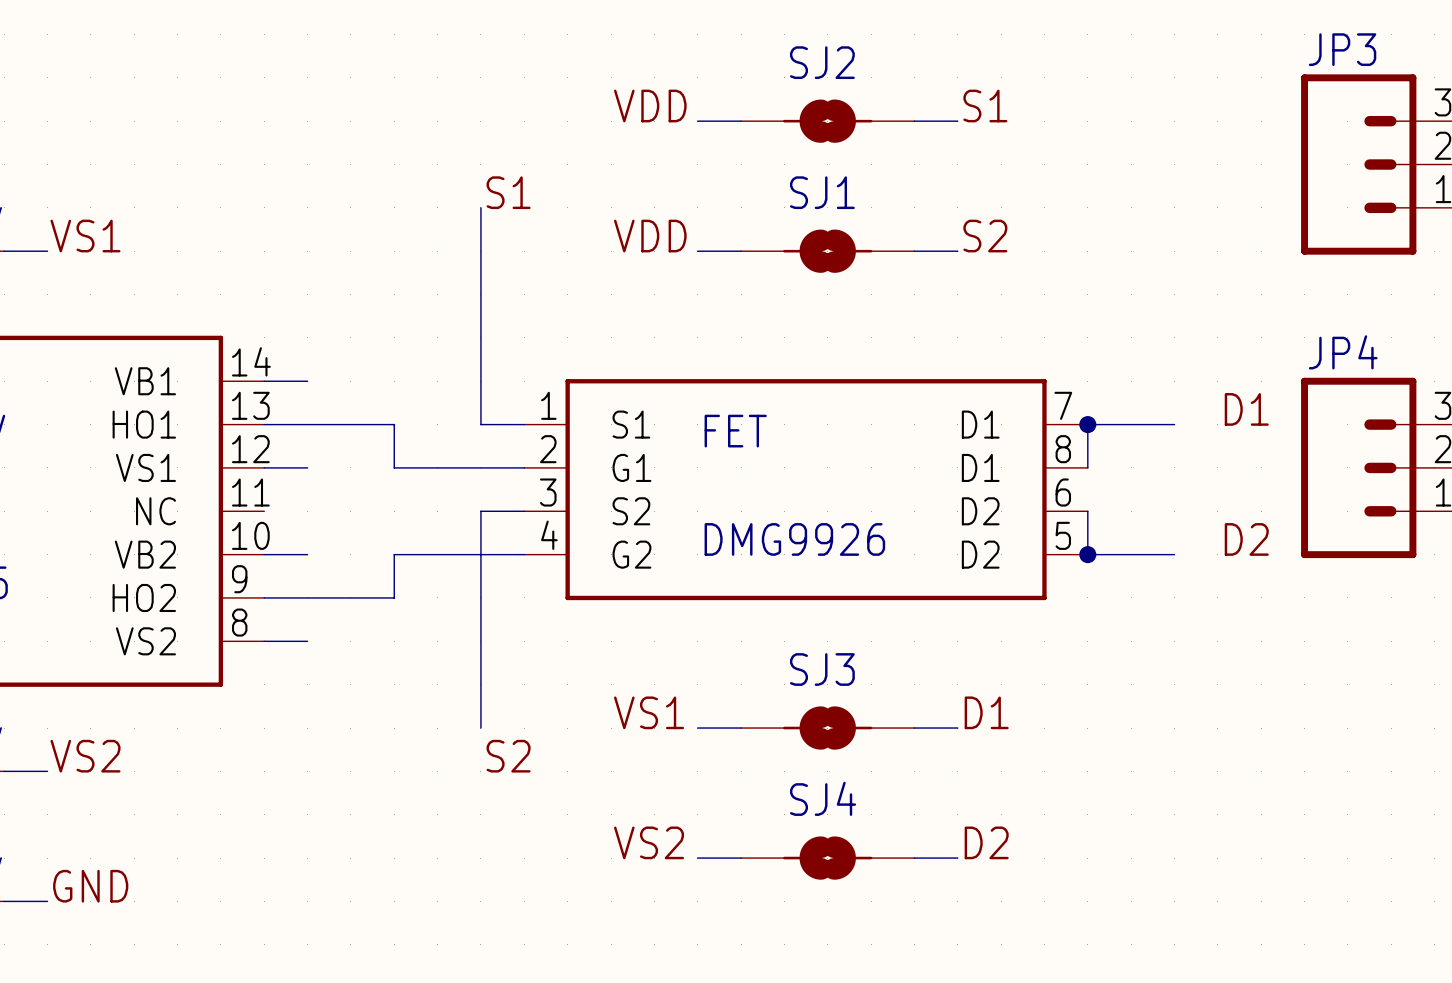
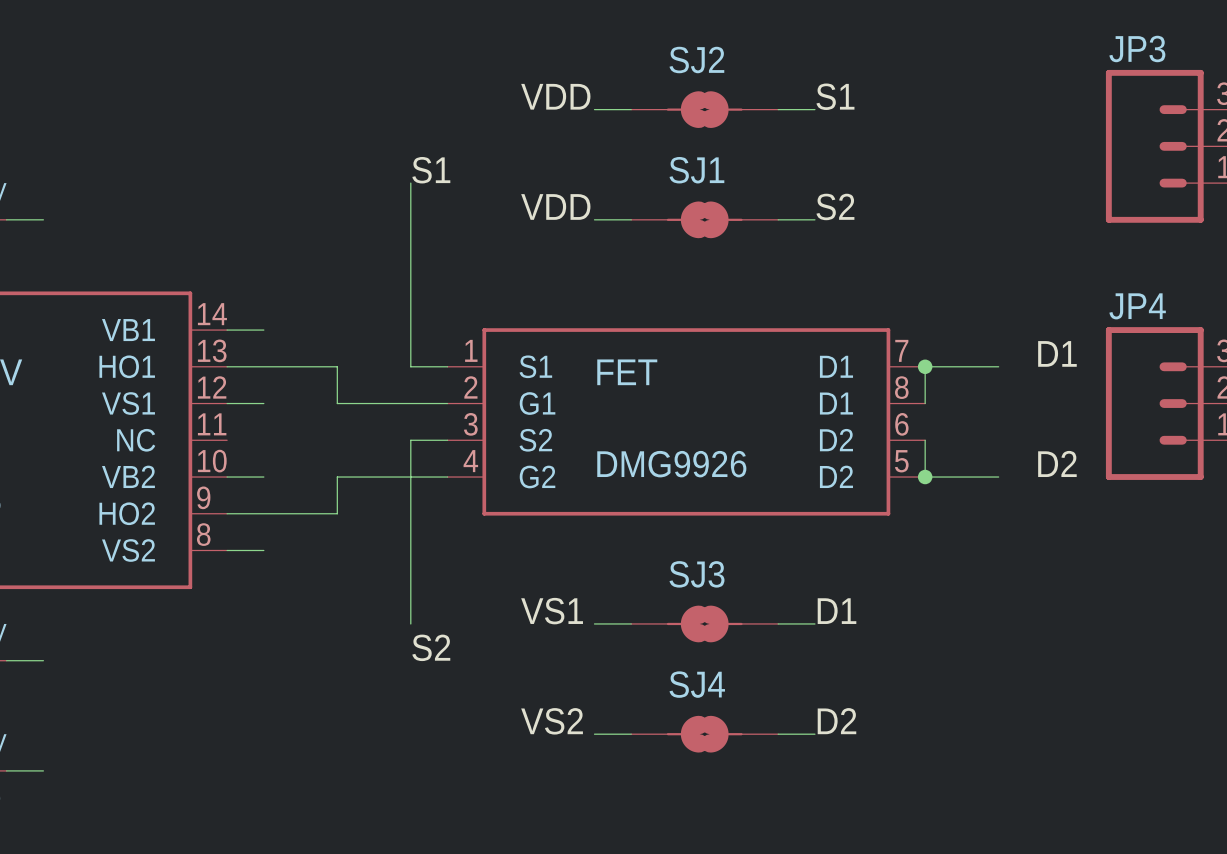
label: VS1 (85, 236) -> none
label: VS2 (85, 756) -> none
label: GND (90, 886) -> none

